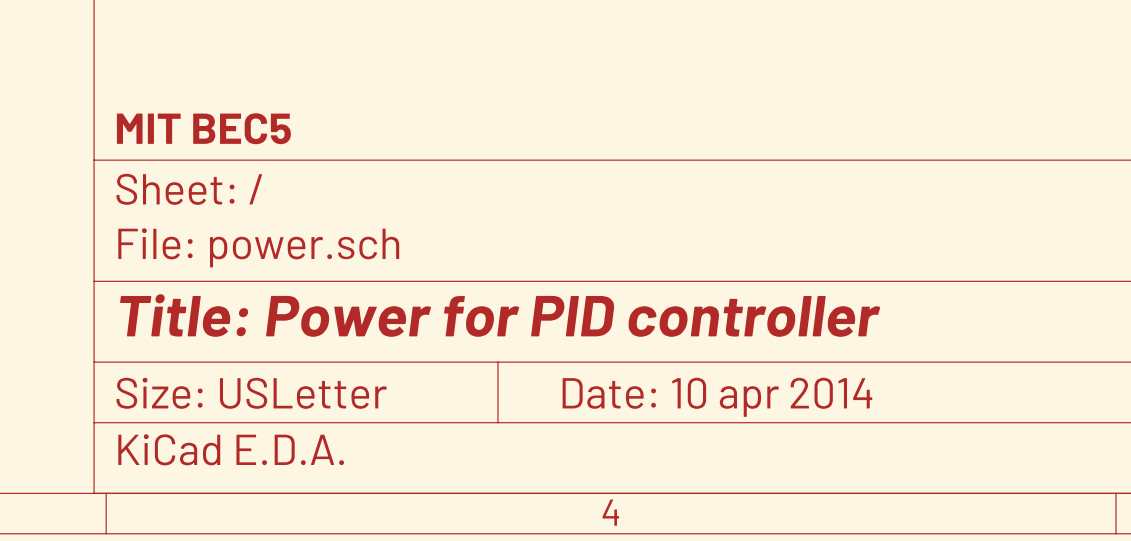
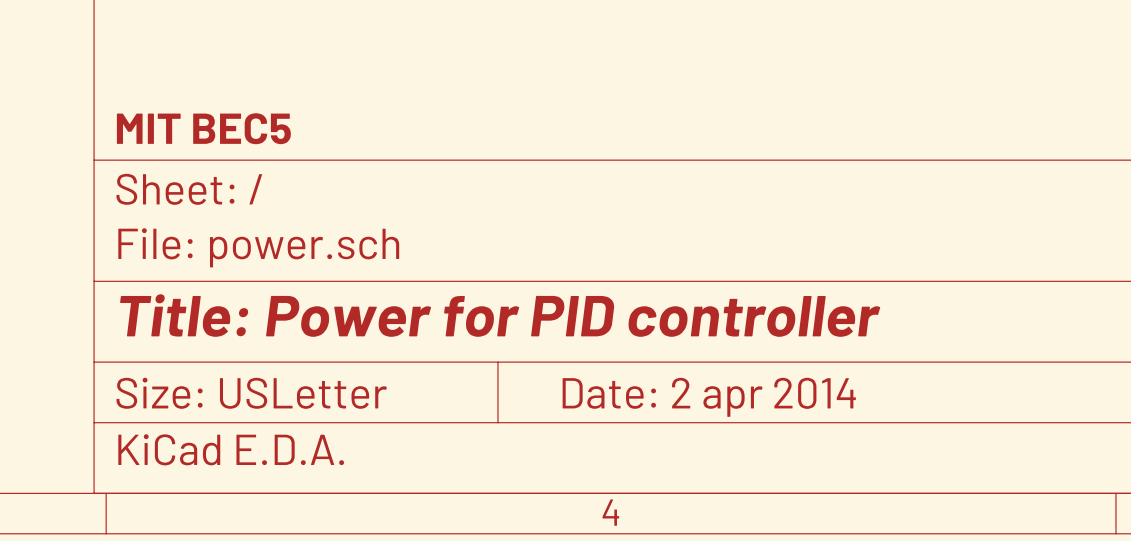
title block: Date: 10 apr 2014 (717, 397) -> Date: 2 apr 2014 (709, 397)

